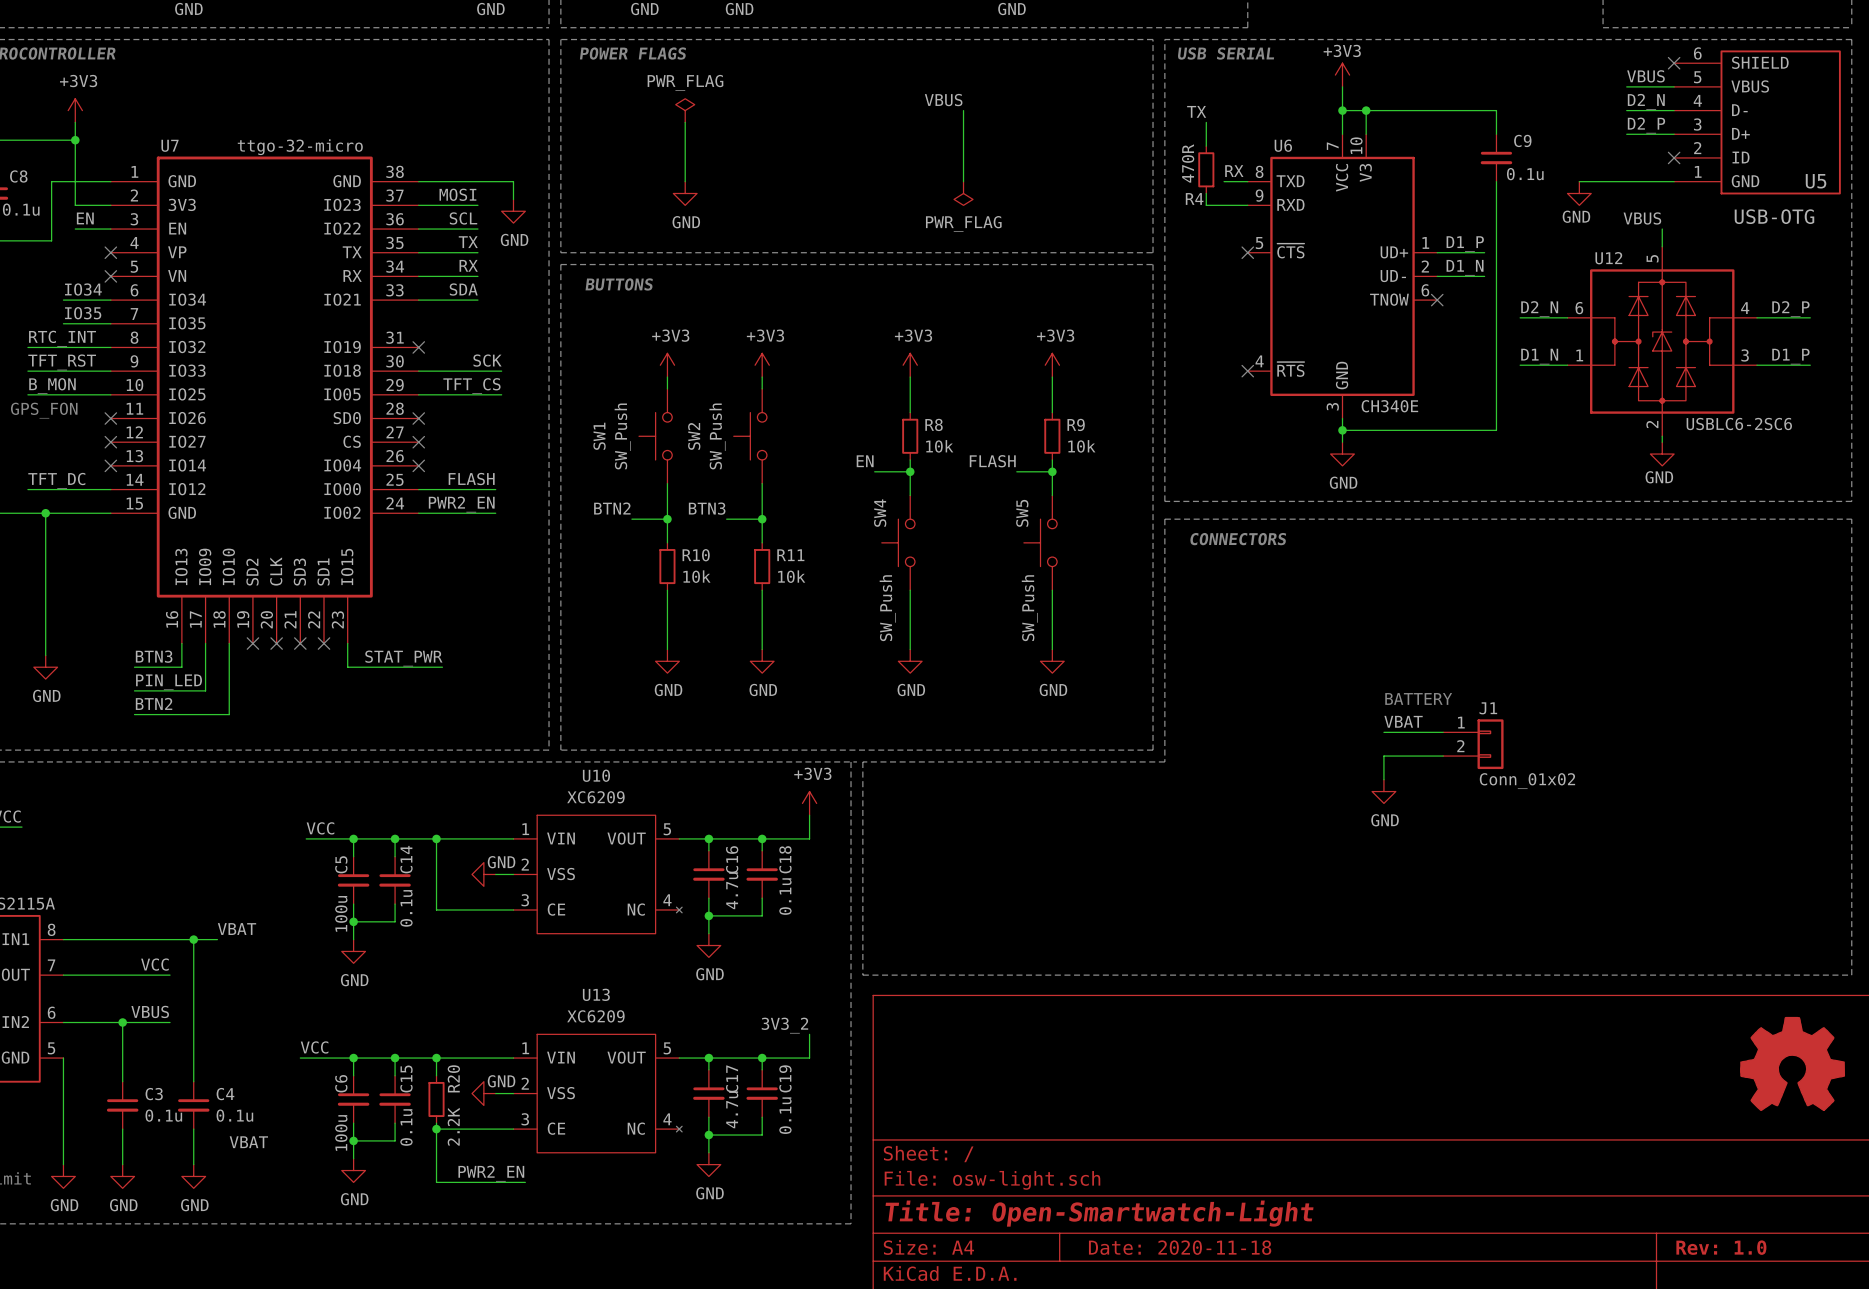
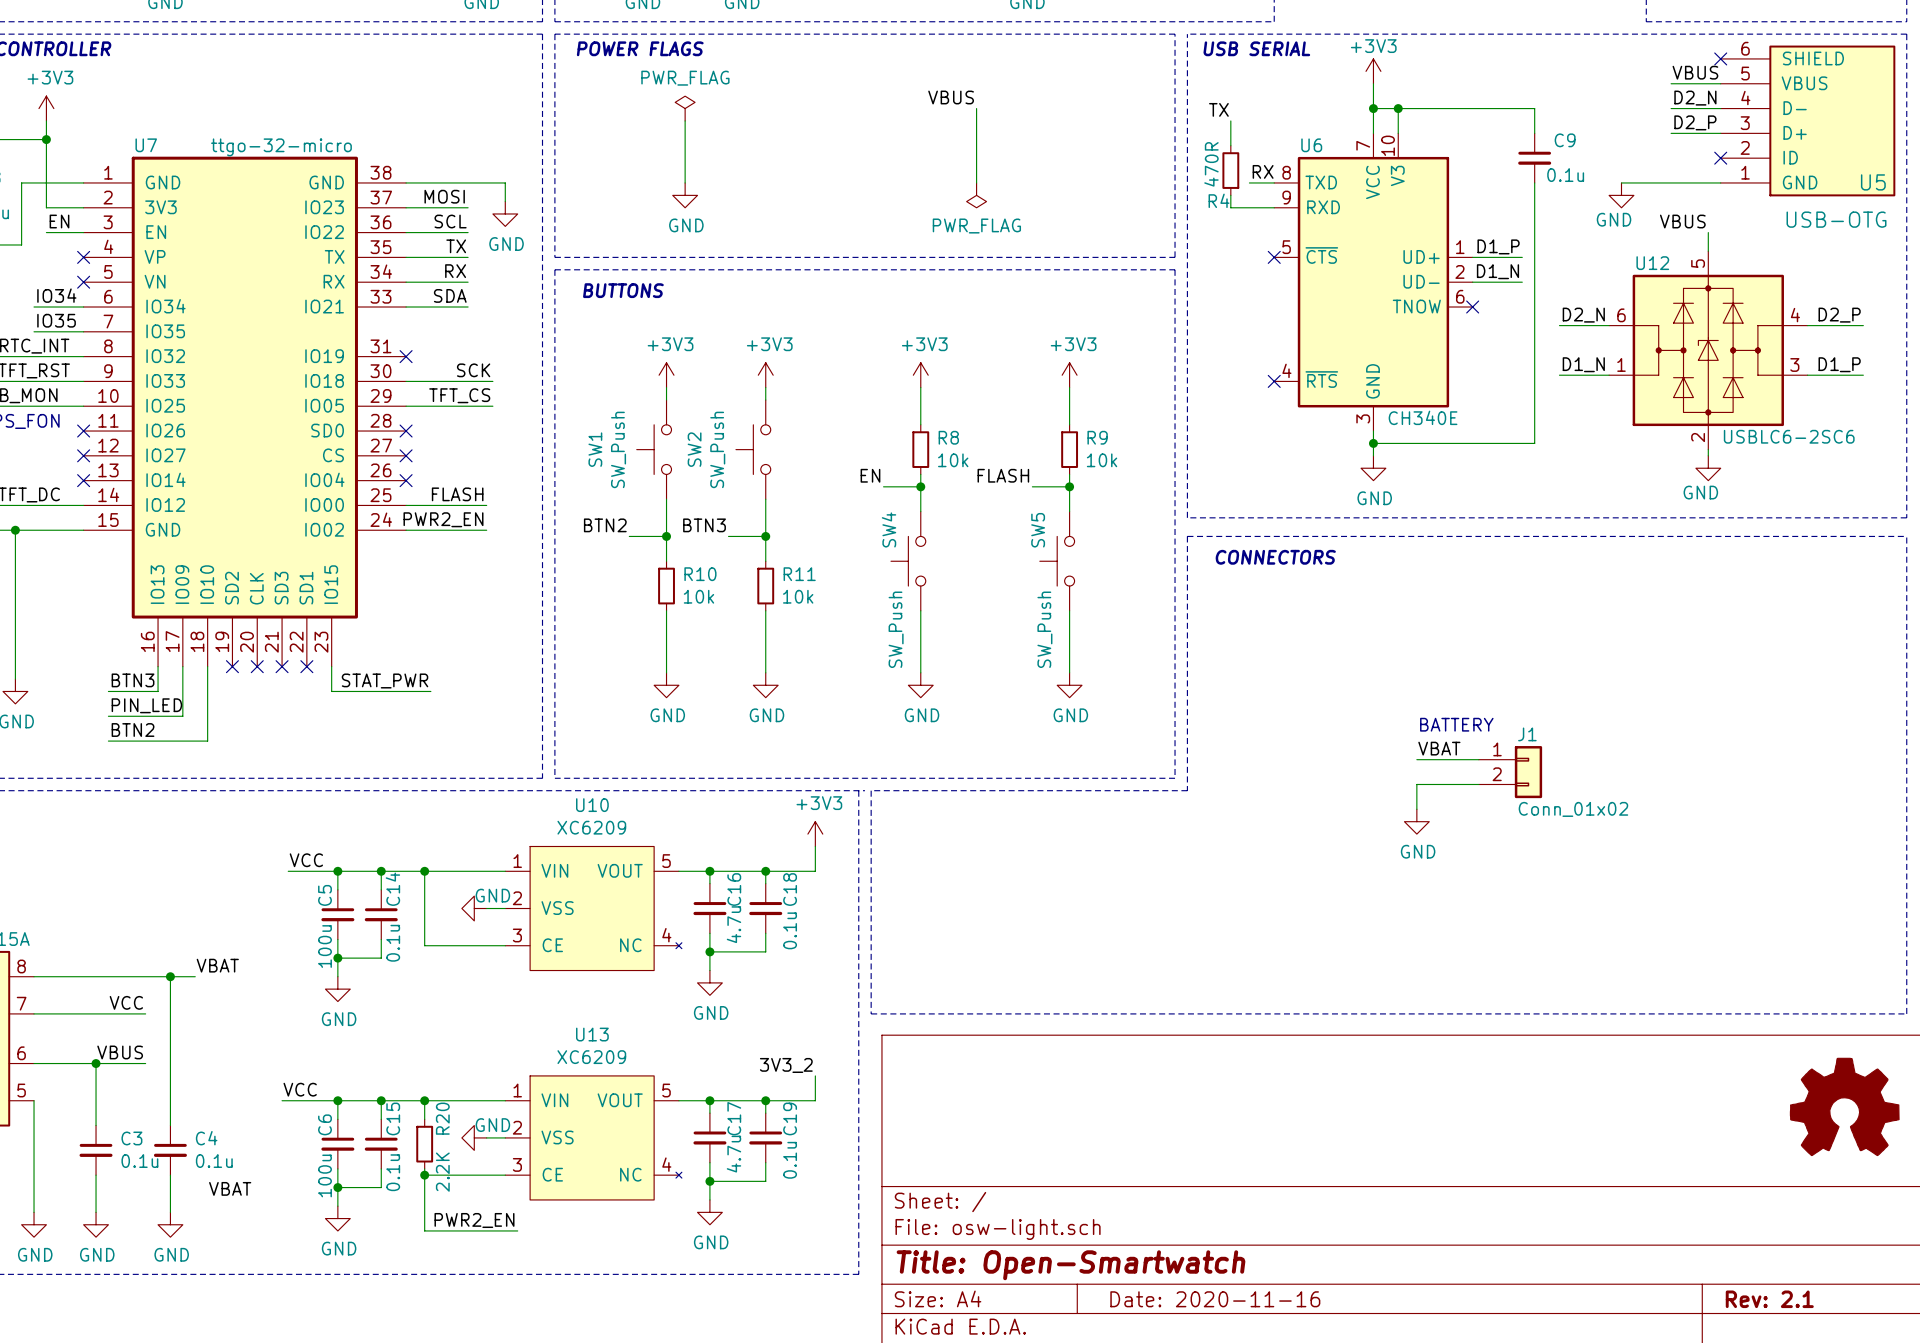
title block: Title: Open-Smartwatch-Light (1099, 1213) -> Title: Open-Smartwatch (1071, 1265)
title block: Date: 2020-11-18 (1180, 1247) -> Date: 2020-11-16 (1215, 1299)
title block: Rev: 1.0 (1721, 1247) -> Rev: 2.1 (1769, 1299)

